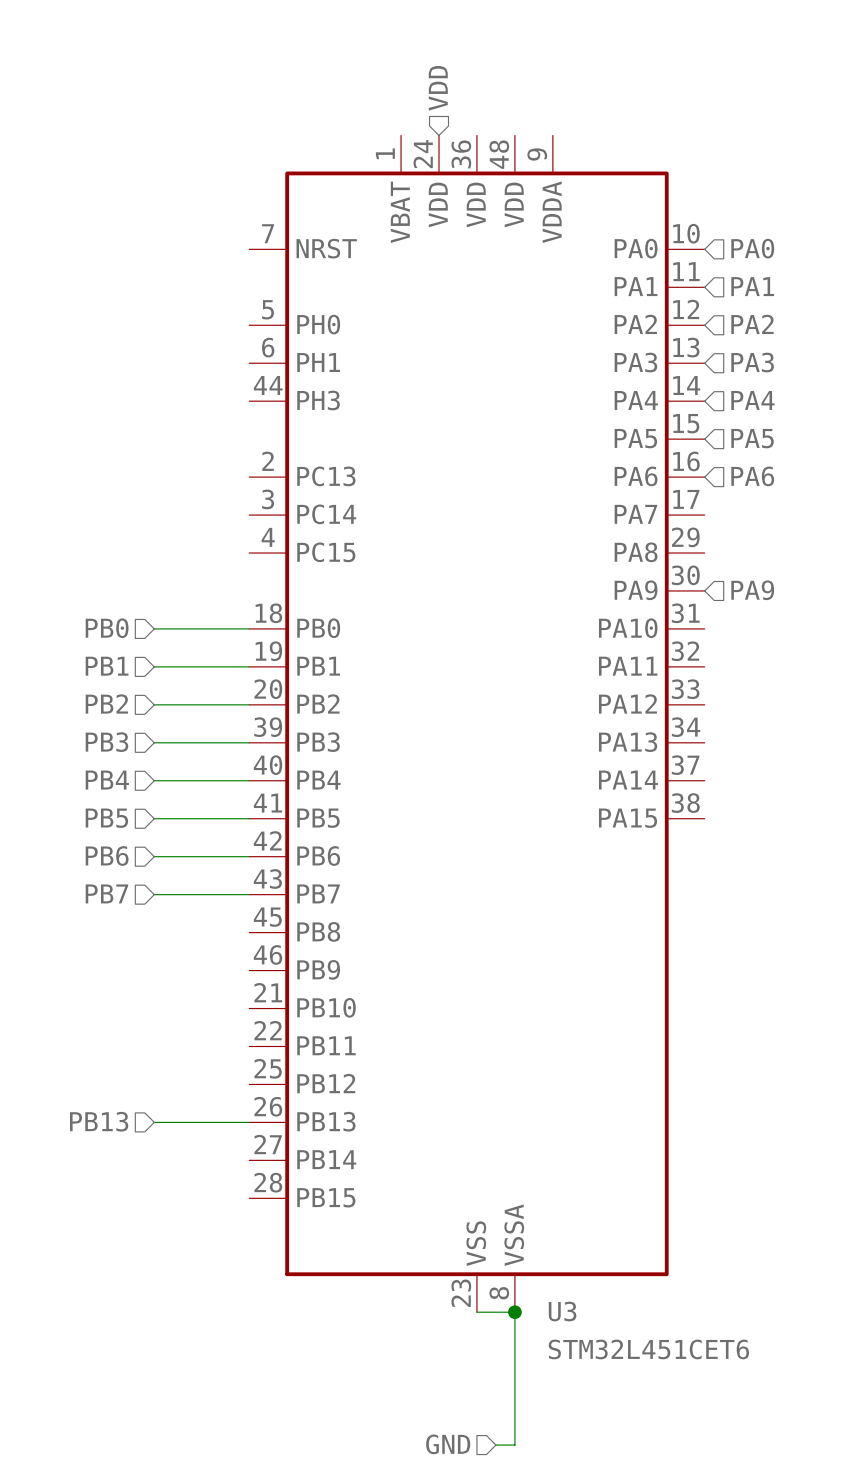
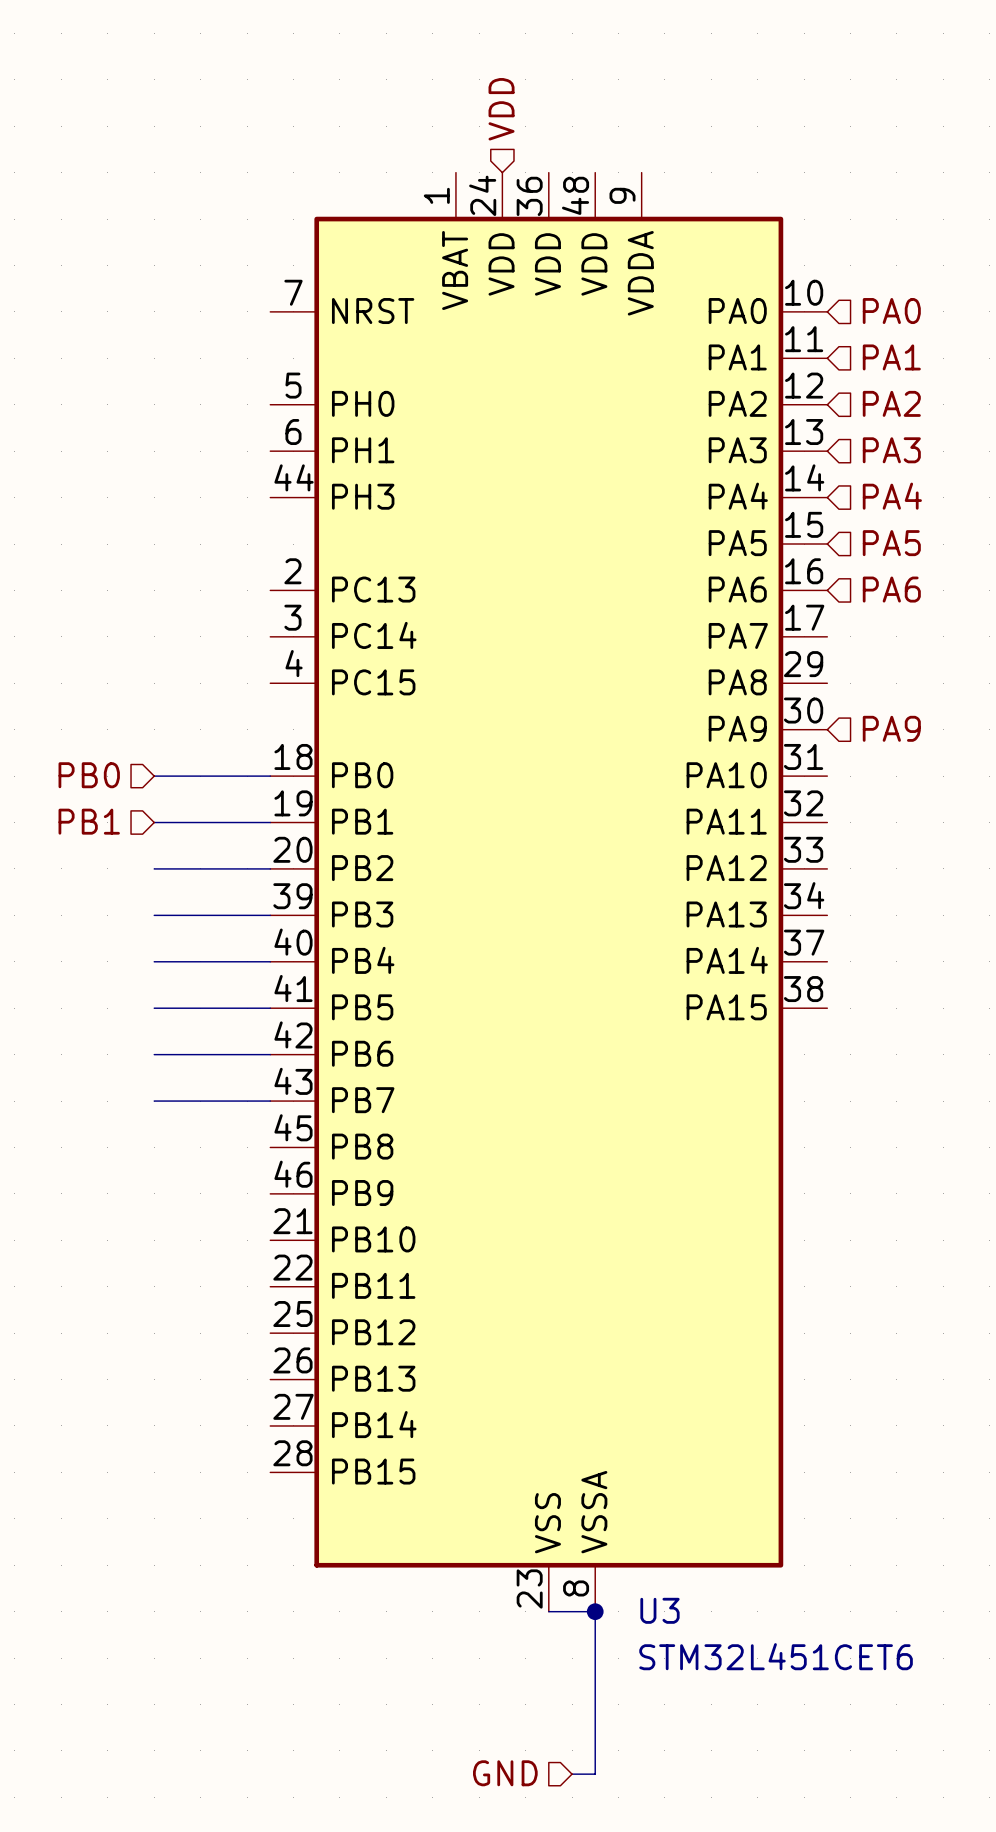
hierarchical label: PB2 (106, 703) -> none
hierarchical label: PB3 (106, 742) -> none
hierarchical label: PB4 (107, 780) -> none
hierarchical label: PB5 (106, 818) -> none
hierarchical label: PB6 (107, 855) -> none
hierarchical label: PB7 (106, 893) -> none
hierarchical label: PB13 (99, 1121) -> none
wire: (154, 1122) (249, 1122) -> none

